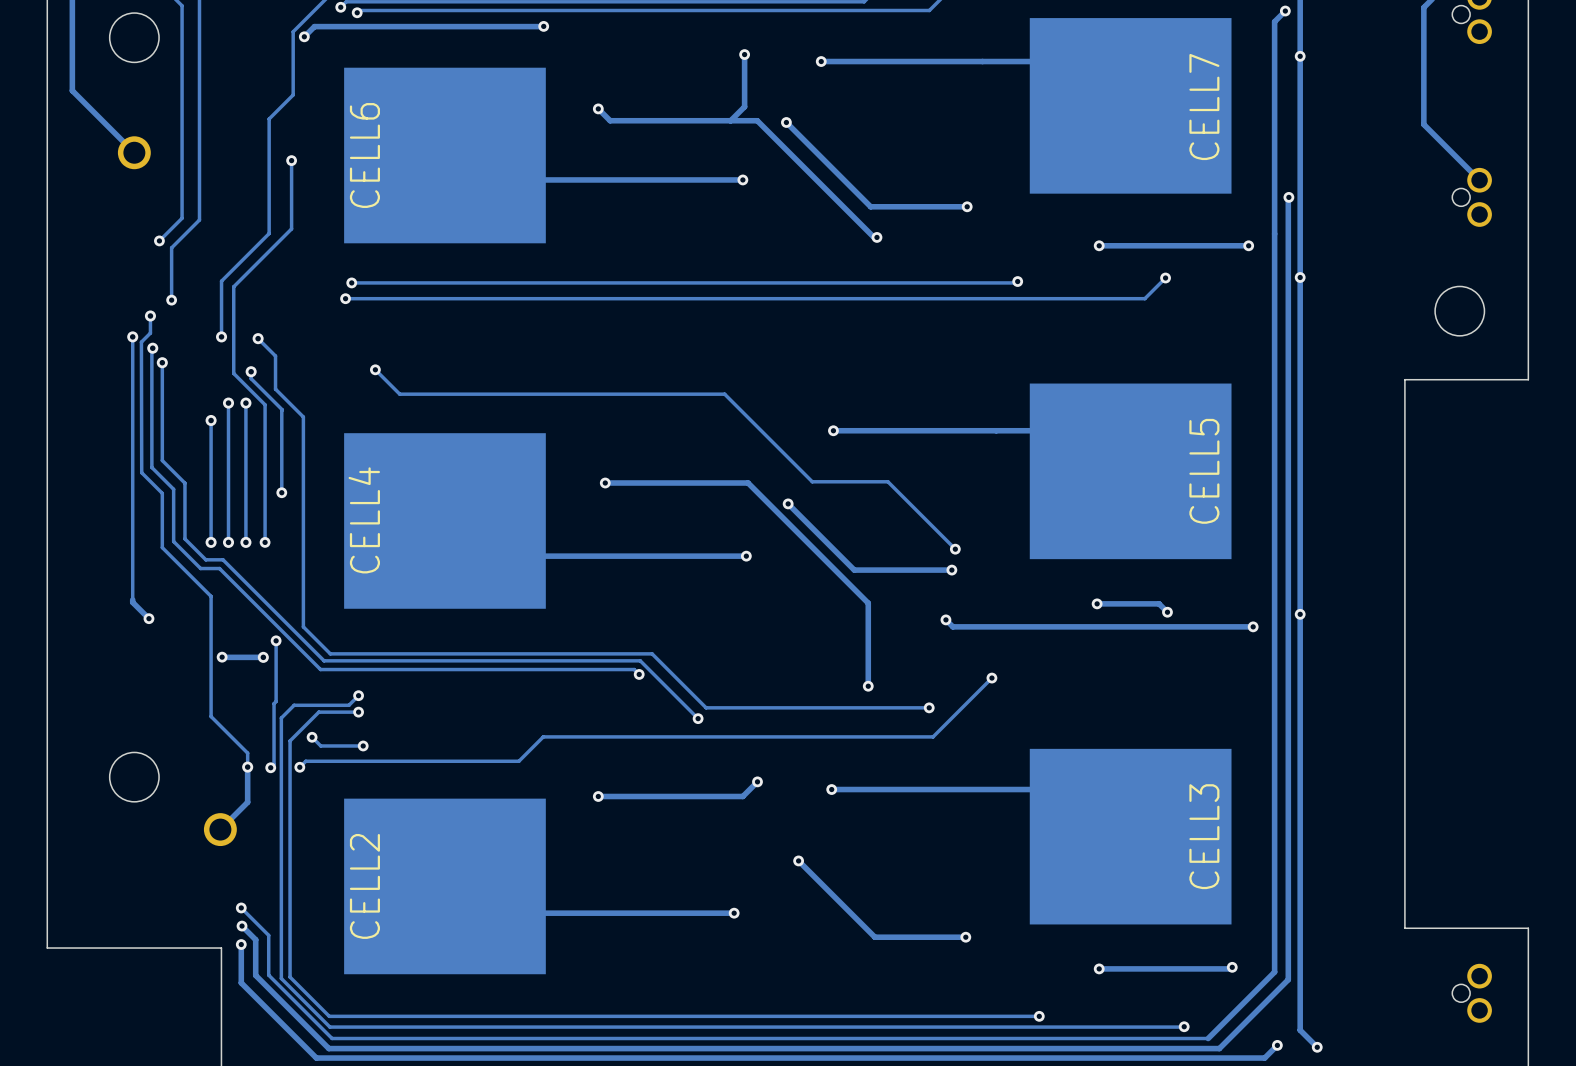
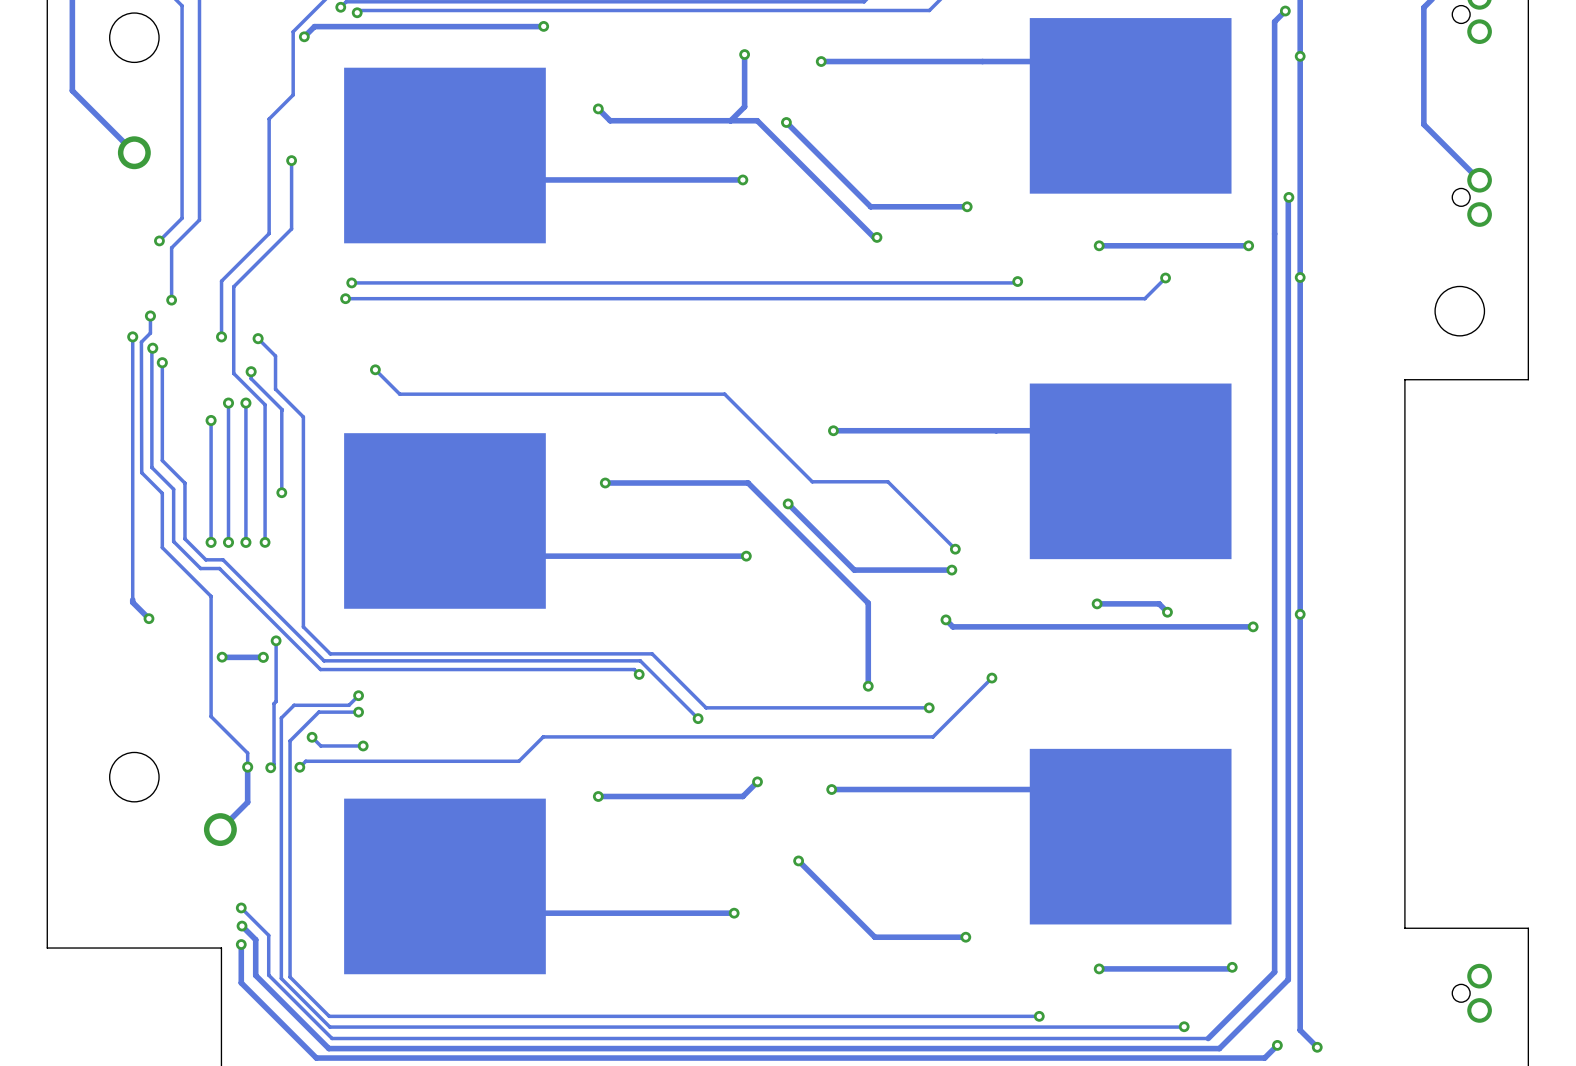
CELL7 name: CELL7 (1204, 107) -> none
CELL6 name: CELL6 (364, 155) -> none
CELL5 name: CELL5 (1204, 471) -> none
CELL4 name: CELL4 (364, 520) -> none
CELL3 name: CELL3 (1204, 836) -> none
CELL2 name: CELL2 (364, 886) -> none

